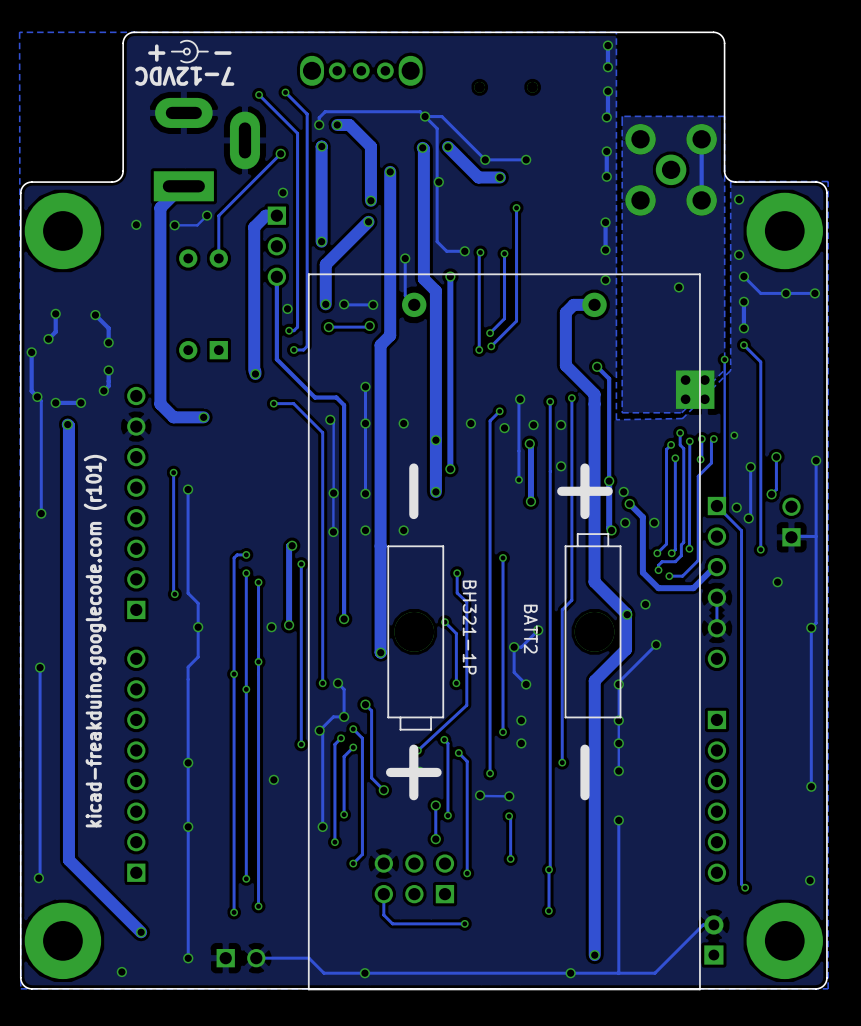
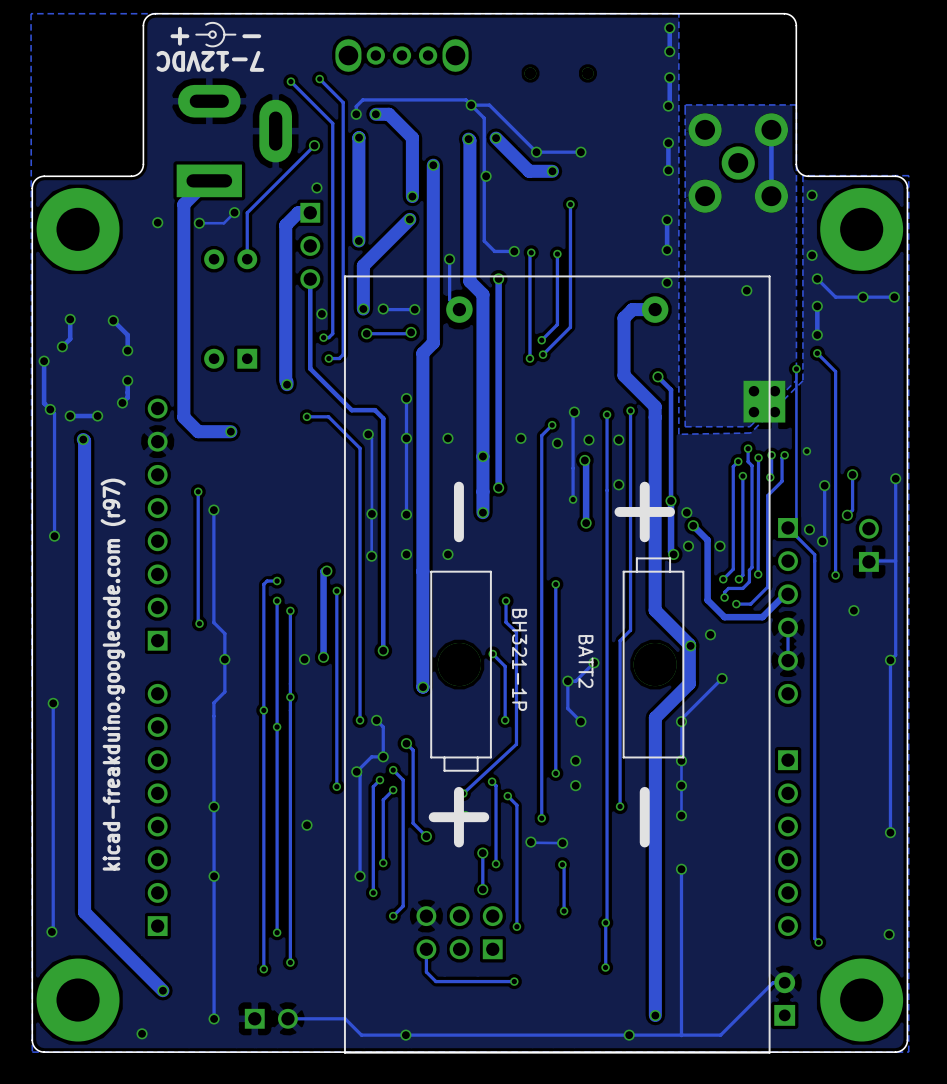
text: kicad-freakduino.googlecode.com (r101) (95, 641) -> kicad-freakduino.googlecode.com (r97) (113, 674)

